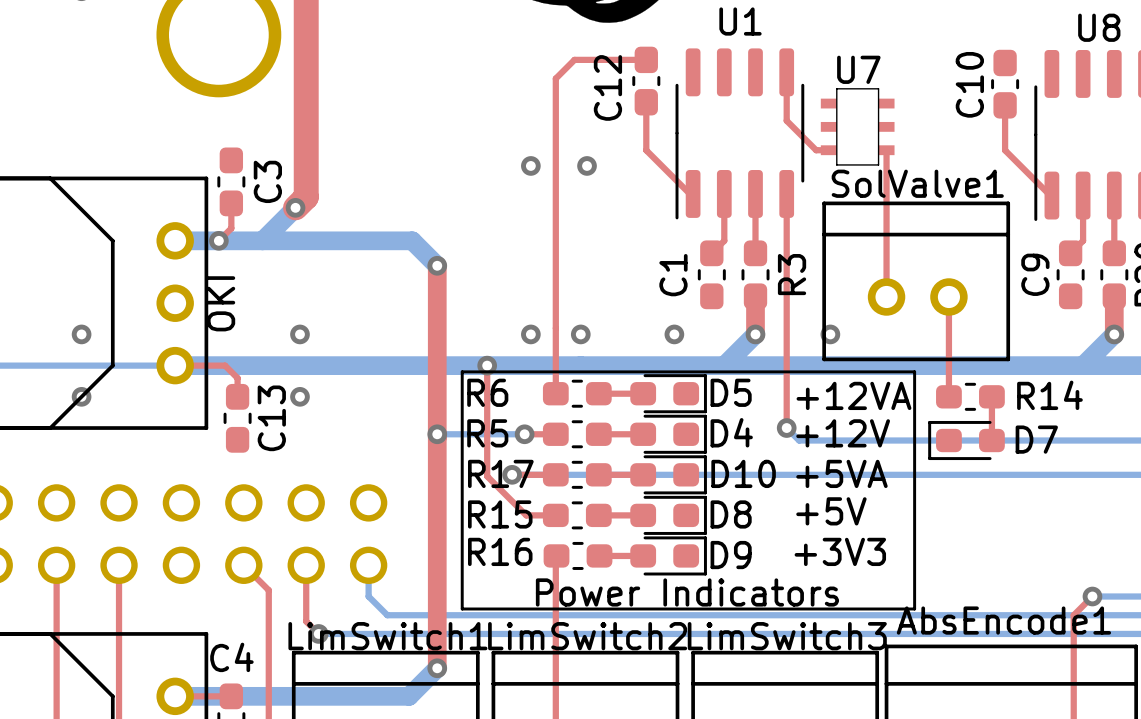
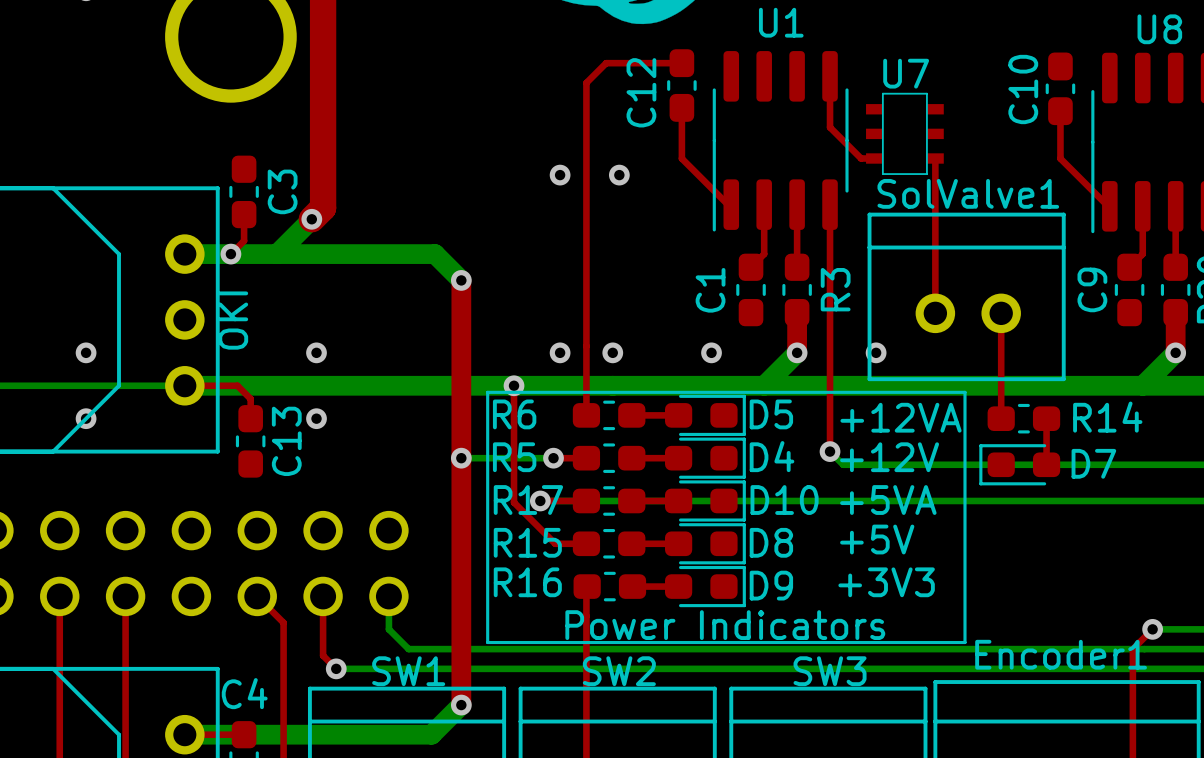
AbsEncode1 name: AbsEncode1 (1003, 620) -> Encoder1 (1061, 654)
LimSwitch1 name: LimSwitch1 (387, 636) -> SW1 (408, 671)
LimSwitch2 name: LimSwitch2 (587, 636) -> SW2 (619, 671)
LimSwitch3 name: LimSwitch3 (787, 636) -> SW3 (830, 671)

